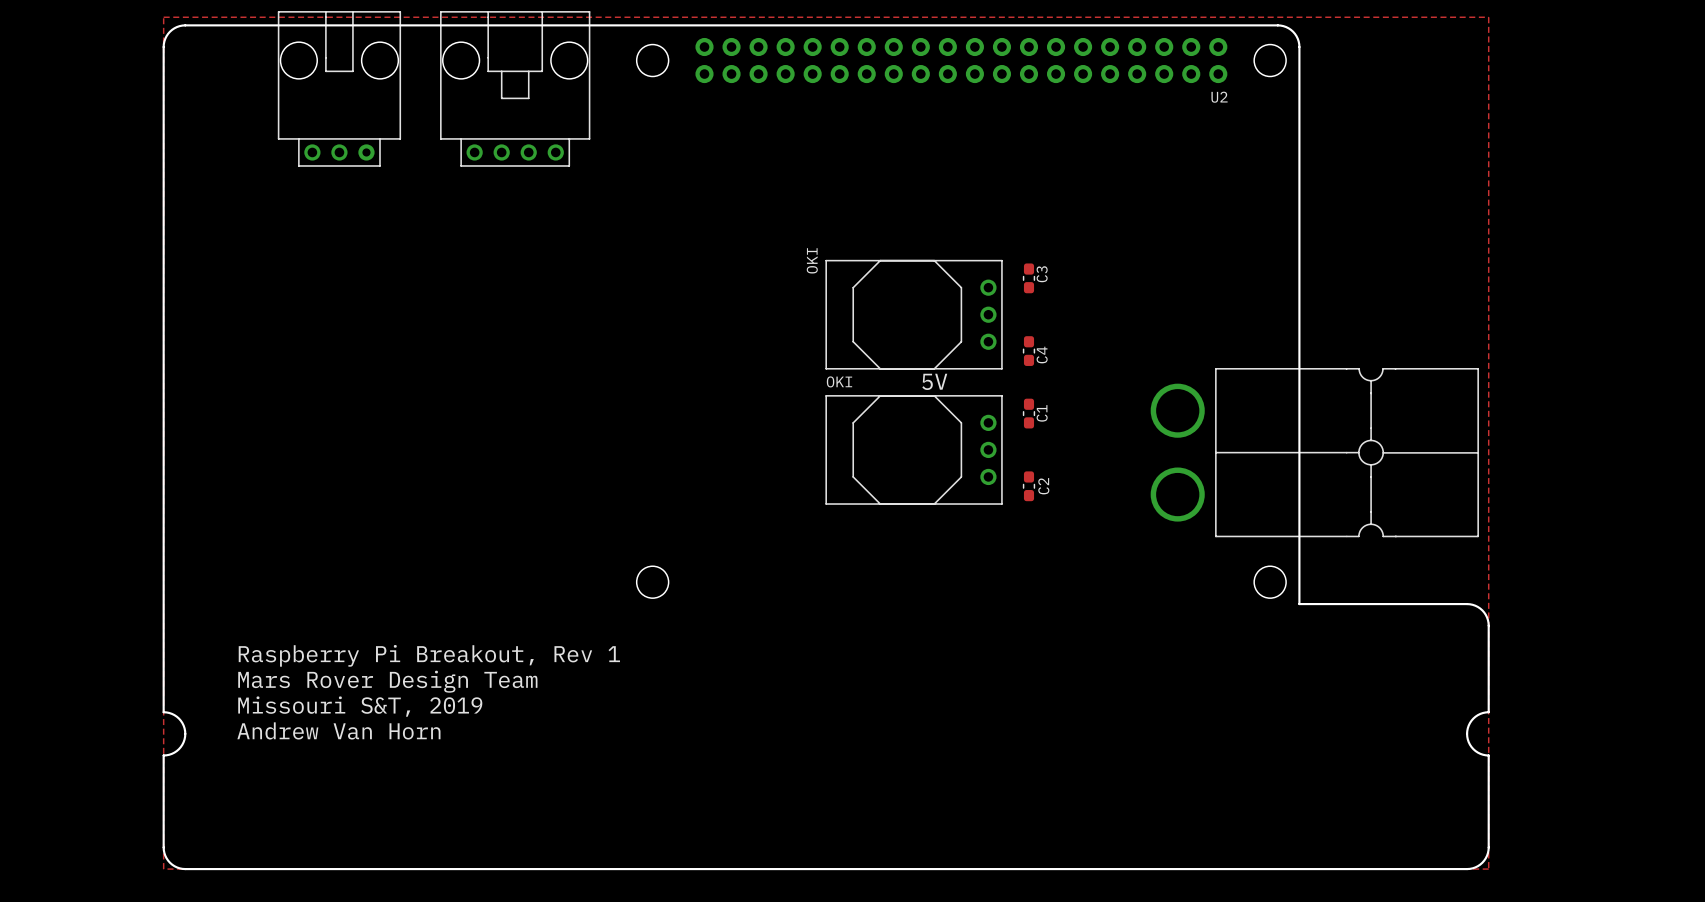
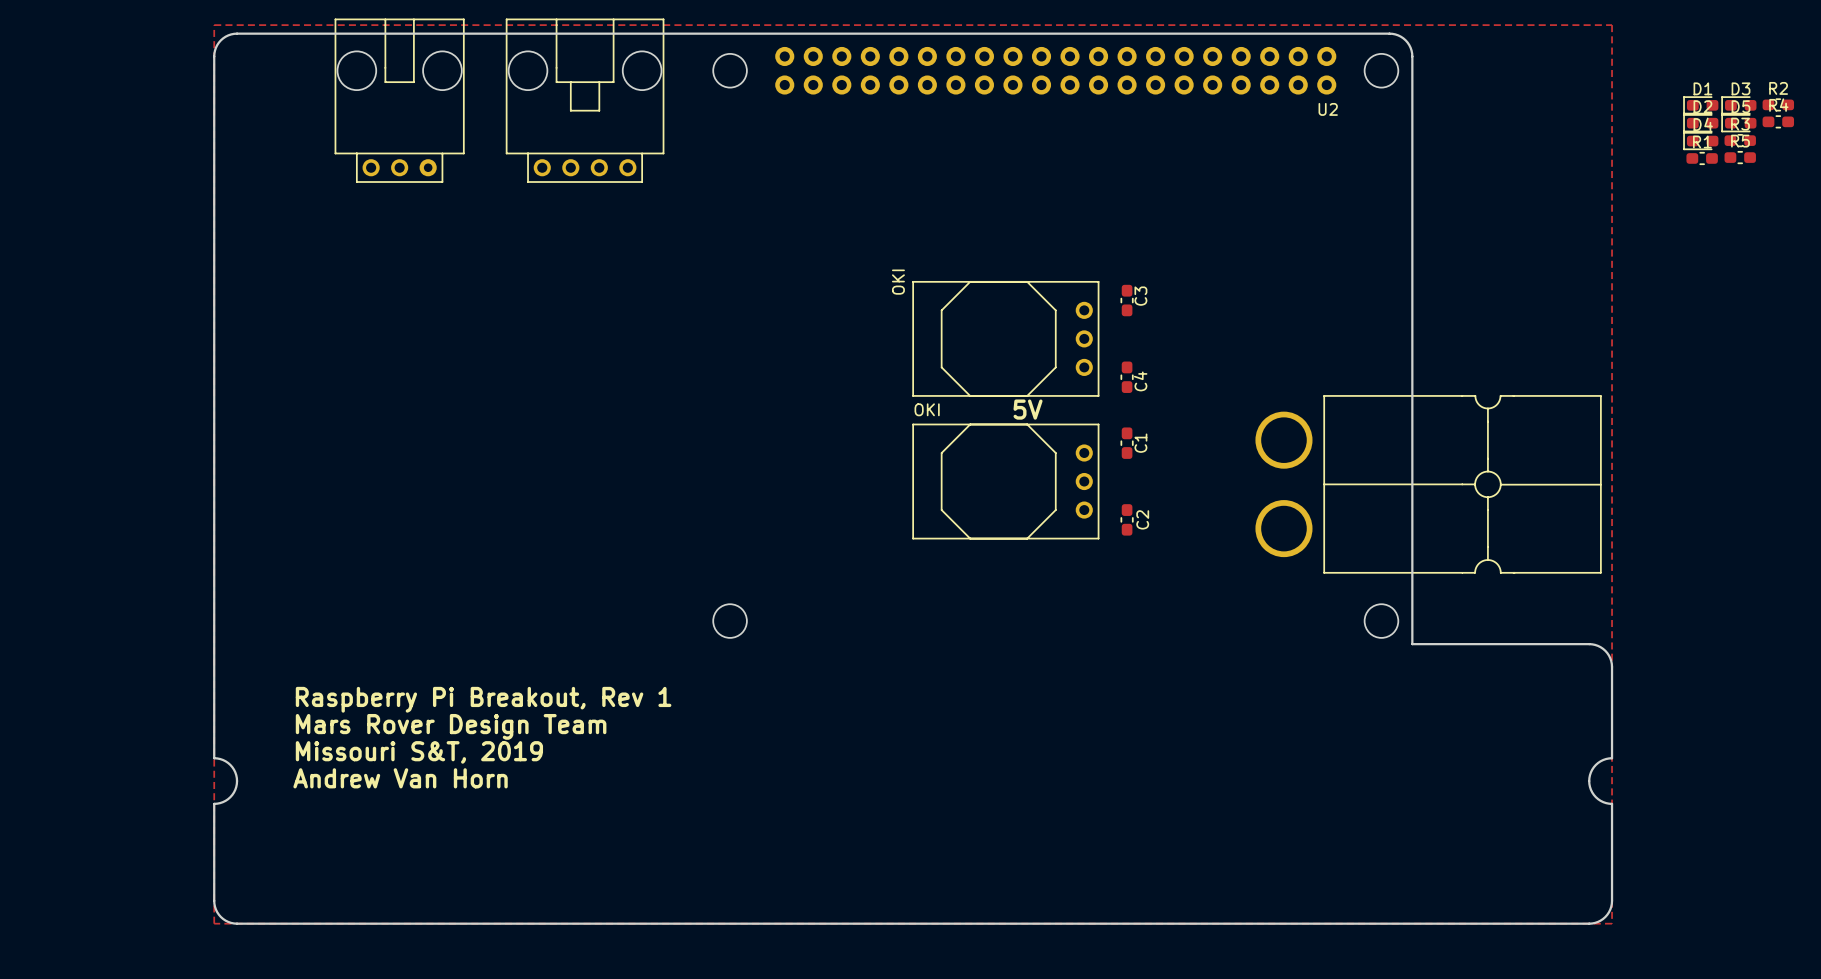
R2: none -> (1778, 104)
D1: none -> (1700, 105)
D3: none -> (1738, 105)
R4: none -> (1778, 121)
D2: none -> (1700, 123)
D5: none -> (1738, 123)
R3: none -> (1740, 140)
D4: none -> (1700, 141)
R5: none -> (1740, 157)
R1: none -> (1702, 158)

